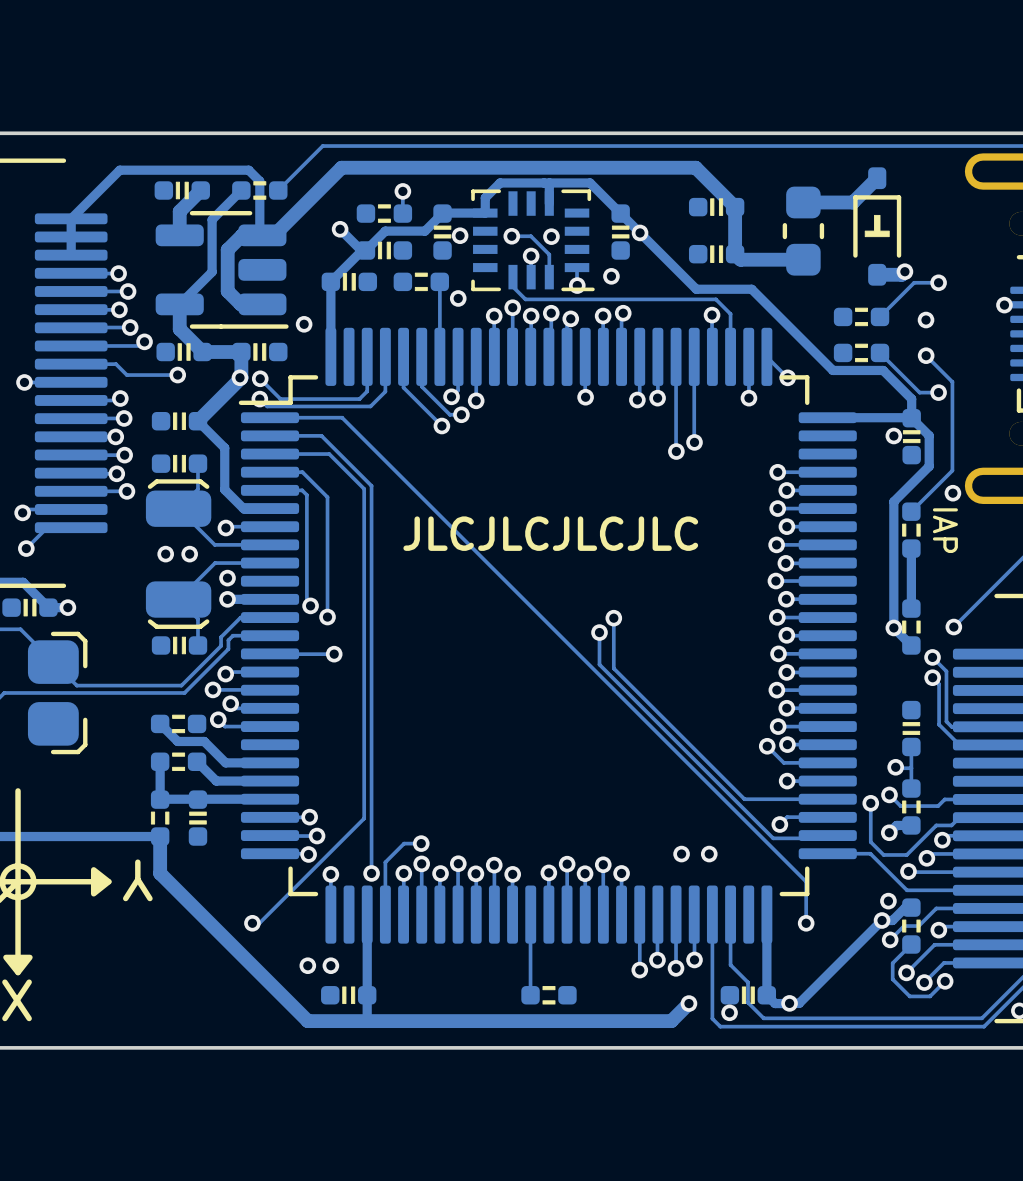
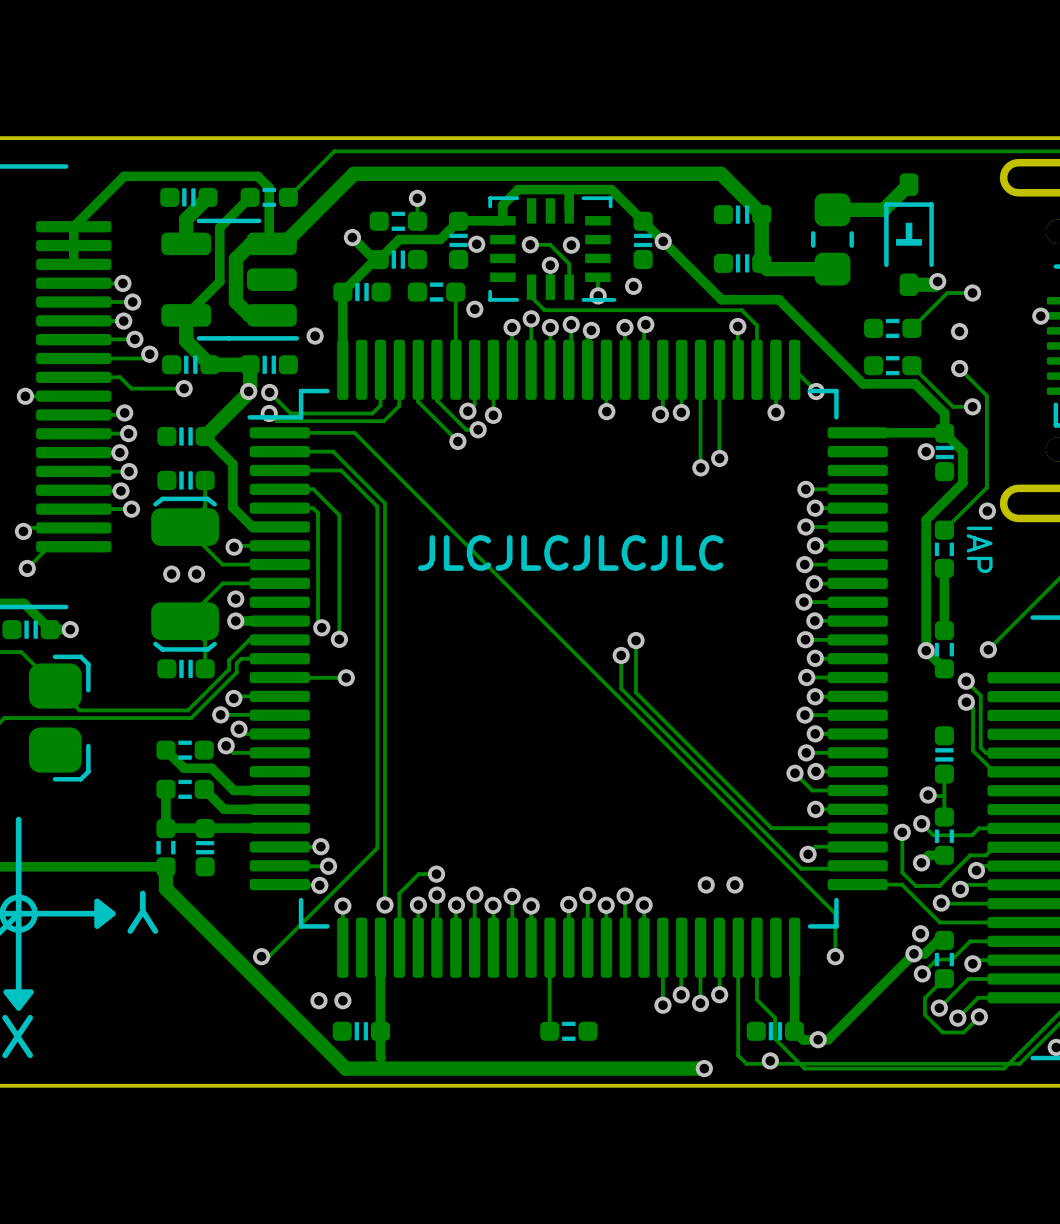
track: (160, 857) (160, 873) (307, 1021) (671, 1021) (688, 1003) -> (165, 888) (345, 1068) (704, 1068)
via: (688, 1003) -> none
via position: (729, 1012) -> (770, 1060)
track: (981, 1018) (763, 1018) -> (1017, 1055) (1004, 1068) (804, 1068) (791, 1055)
via: none -> (704, 1068)

